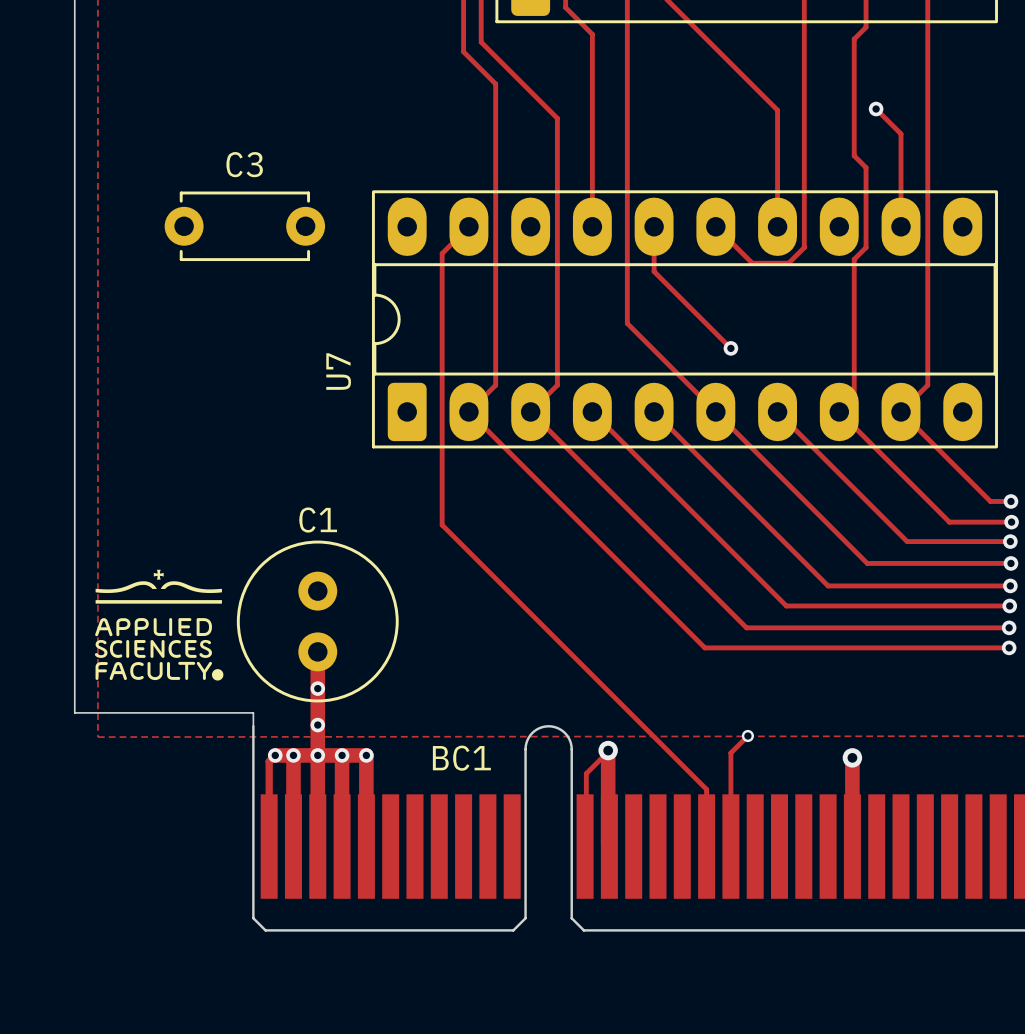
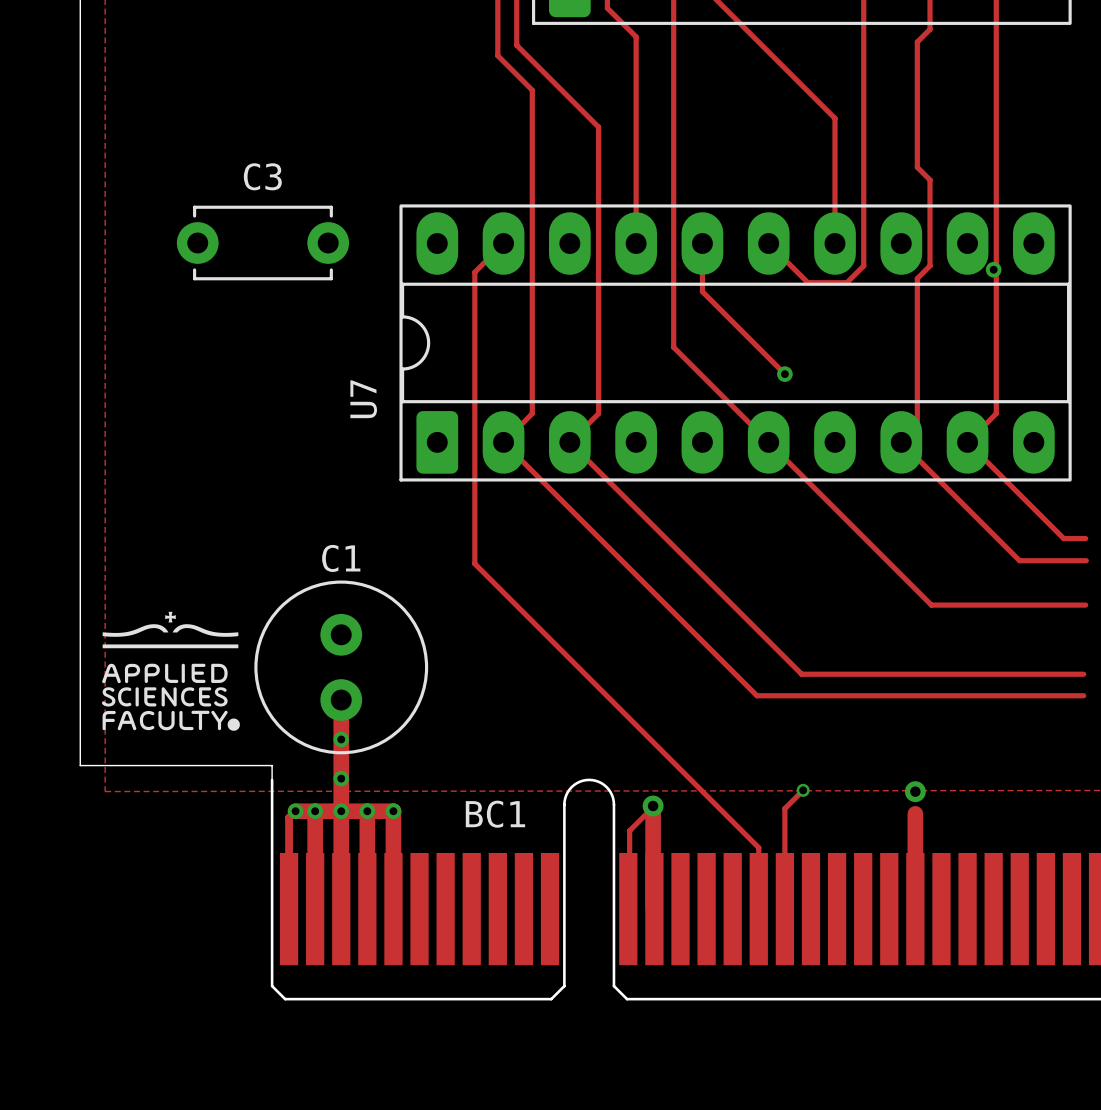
track: (876, 109) (901, 133) (901, 226) -> none
via: (876, 109) -> none
via: none -> (993, 269)
track: (592, 411) (786, 605) (1009, 605) -> none
track: (654, 411) (828, 585) (1010, 585) -> none
track: (777, 411) (907, 541) (1010, 541) -> none
via: (1010, 501) -> none
via: (1011, 522) -> none
via: (1010, 541) -> none
via: (1010, 563) -> none
via: (1010, 585) -> none
via: (1009, 605) -> none
via: (1009, 627) -> none
via: (1009, 647) -> none
via position: (852, 757) -> (915, 791)

